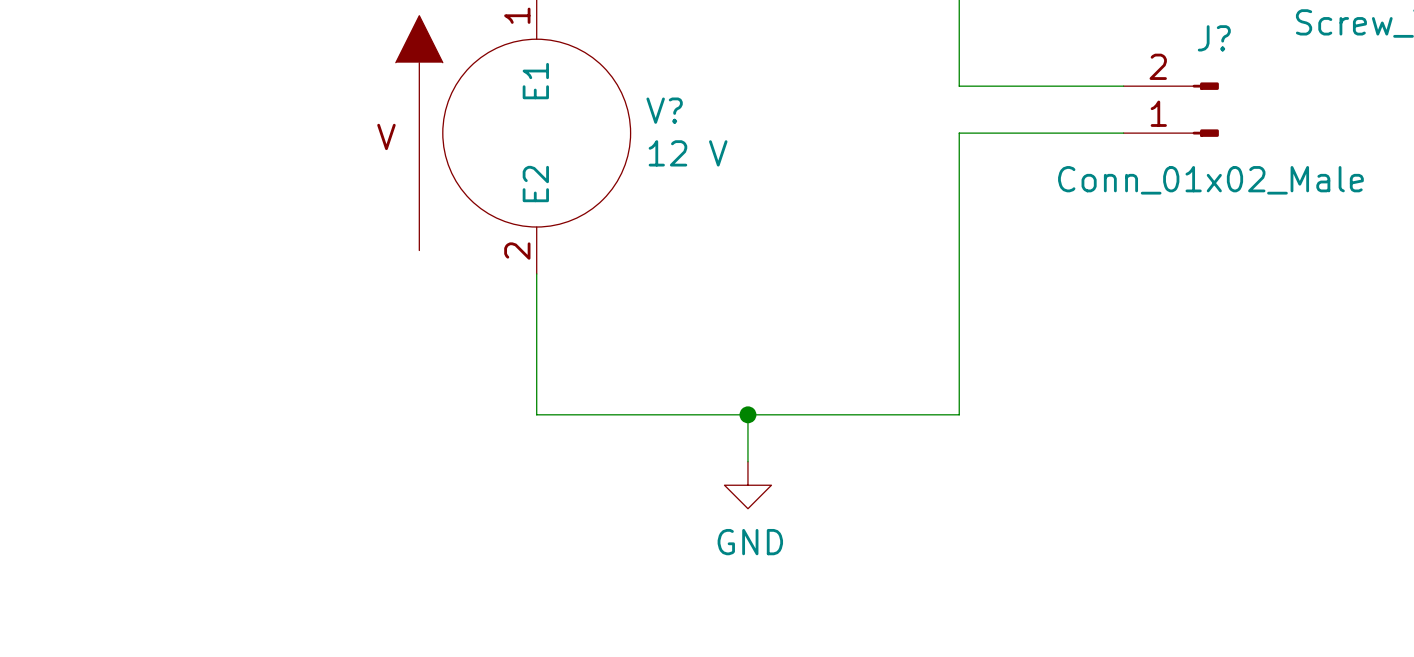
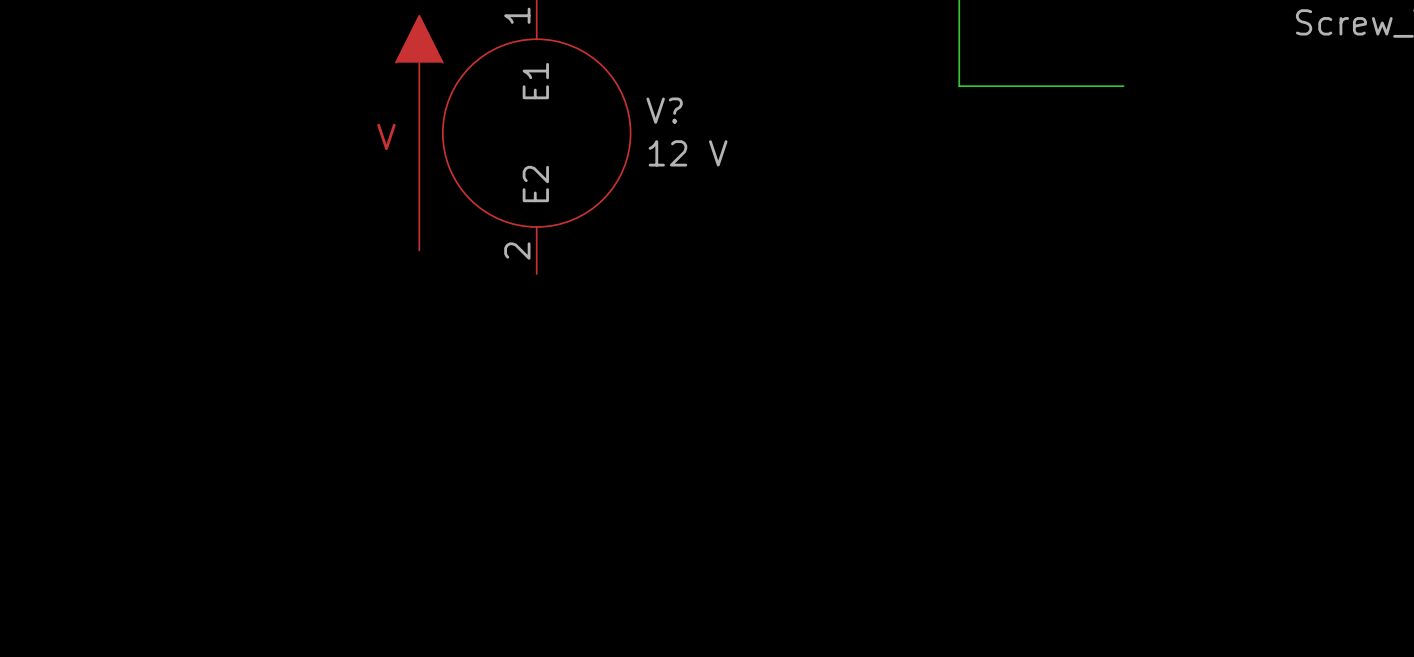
J?: Conn_01x02_Male (1171, 109) -> none
wire: (1123, 133) (959, 133) (959, 414) (536, 414) (536, 273) -> none
wire: (747, 414) (747, 461) -> none
junction: (747, 414) -> none
power symbol: GND (747, 485) -> none

